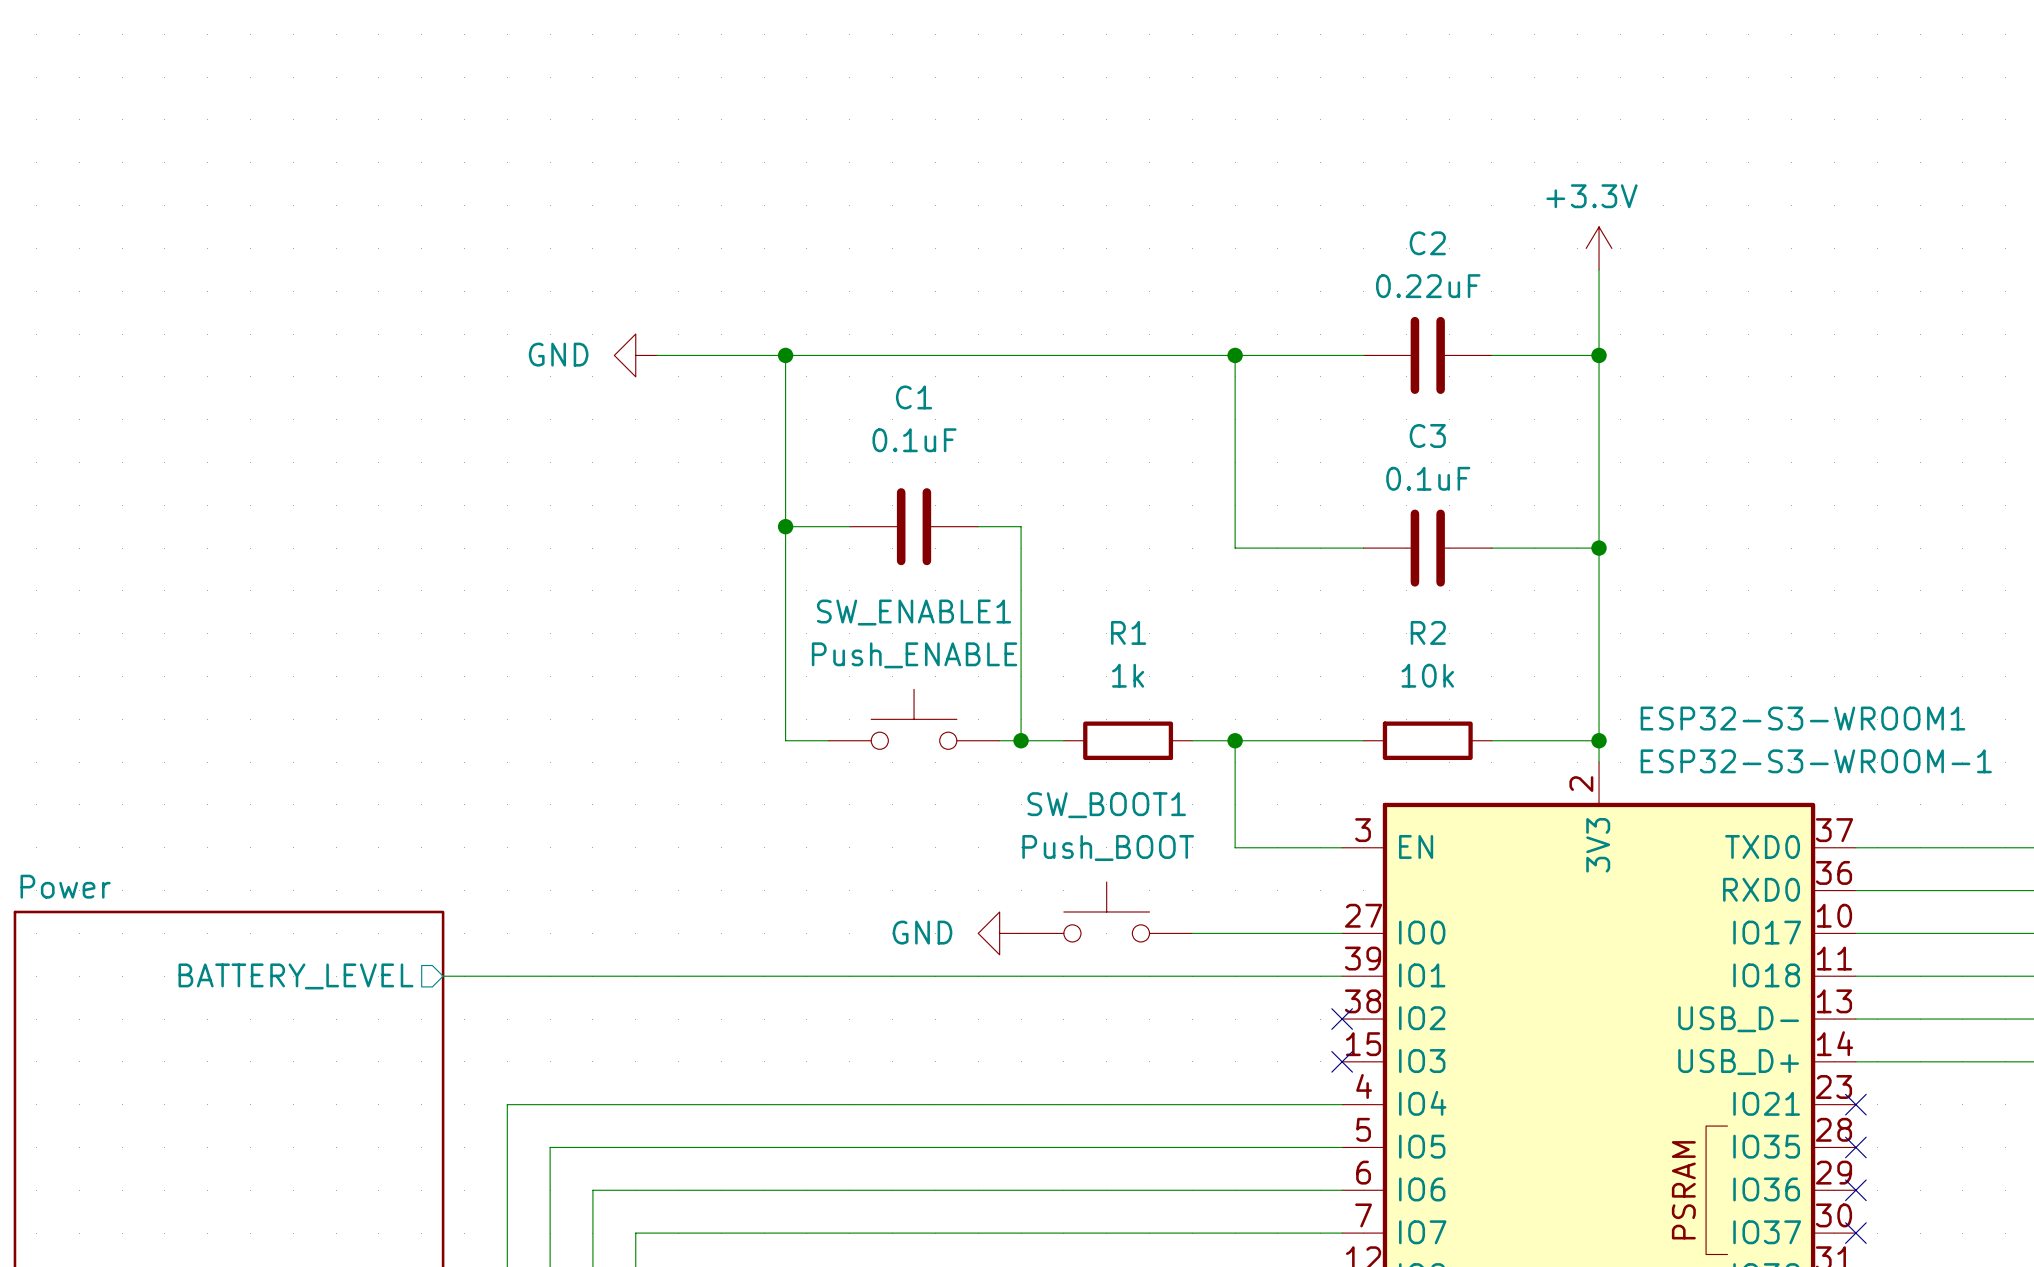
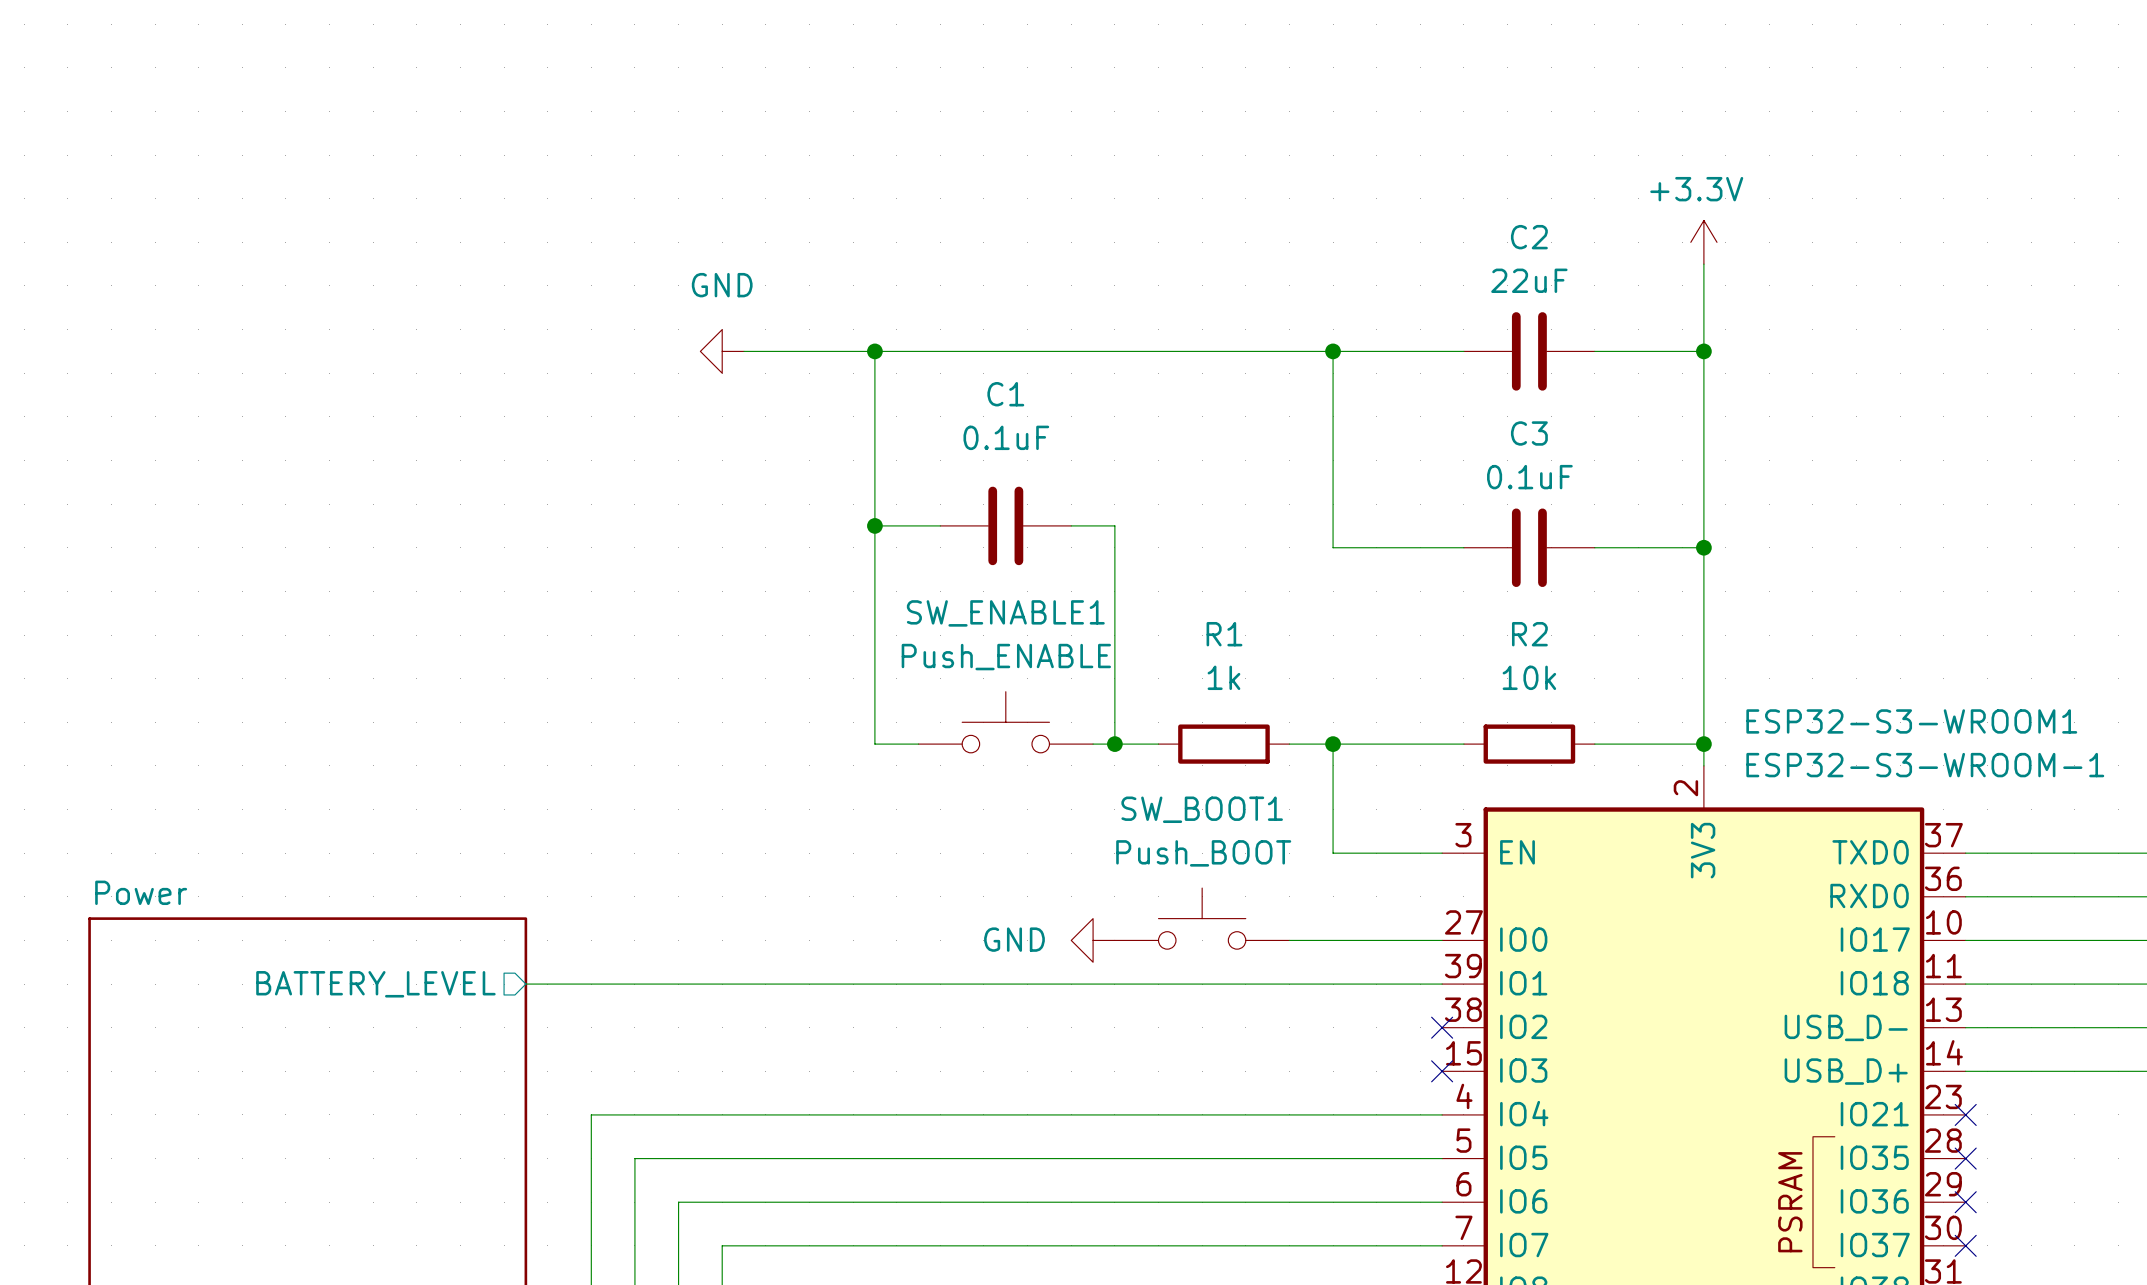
C2 value: 0.22uF (1428, 286) -> 22uF (1529, 280)
power symbol text position: GND (558, 354) -> GND (722, 285)

